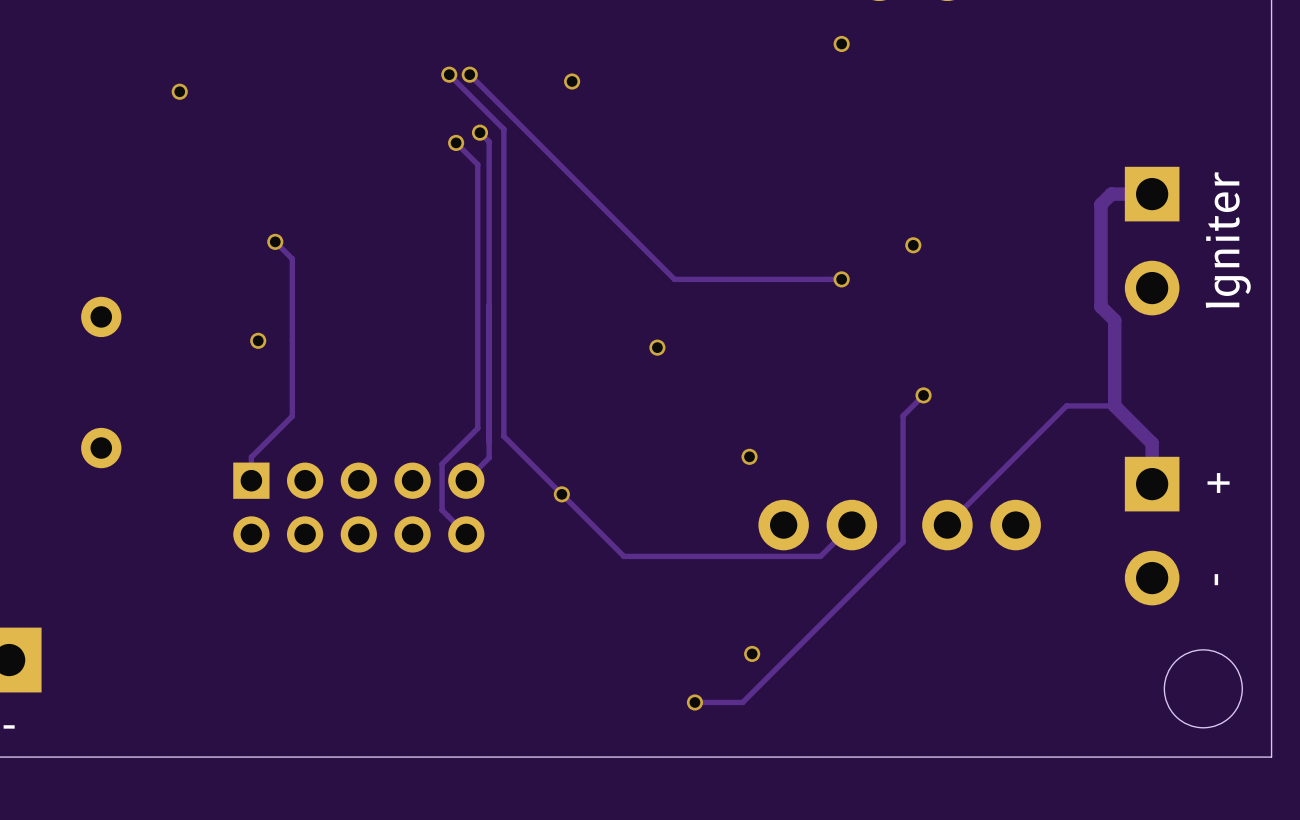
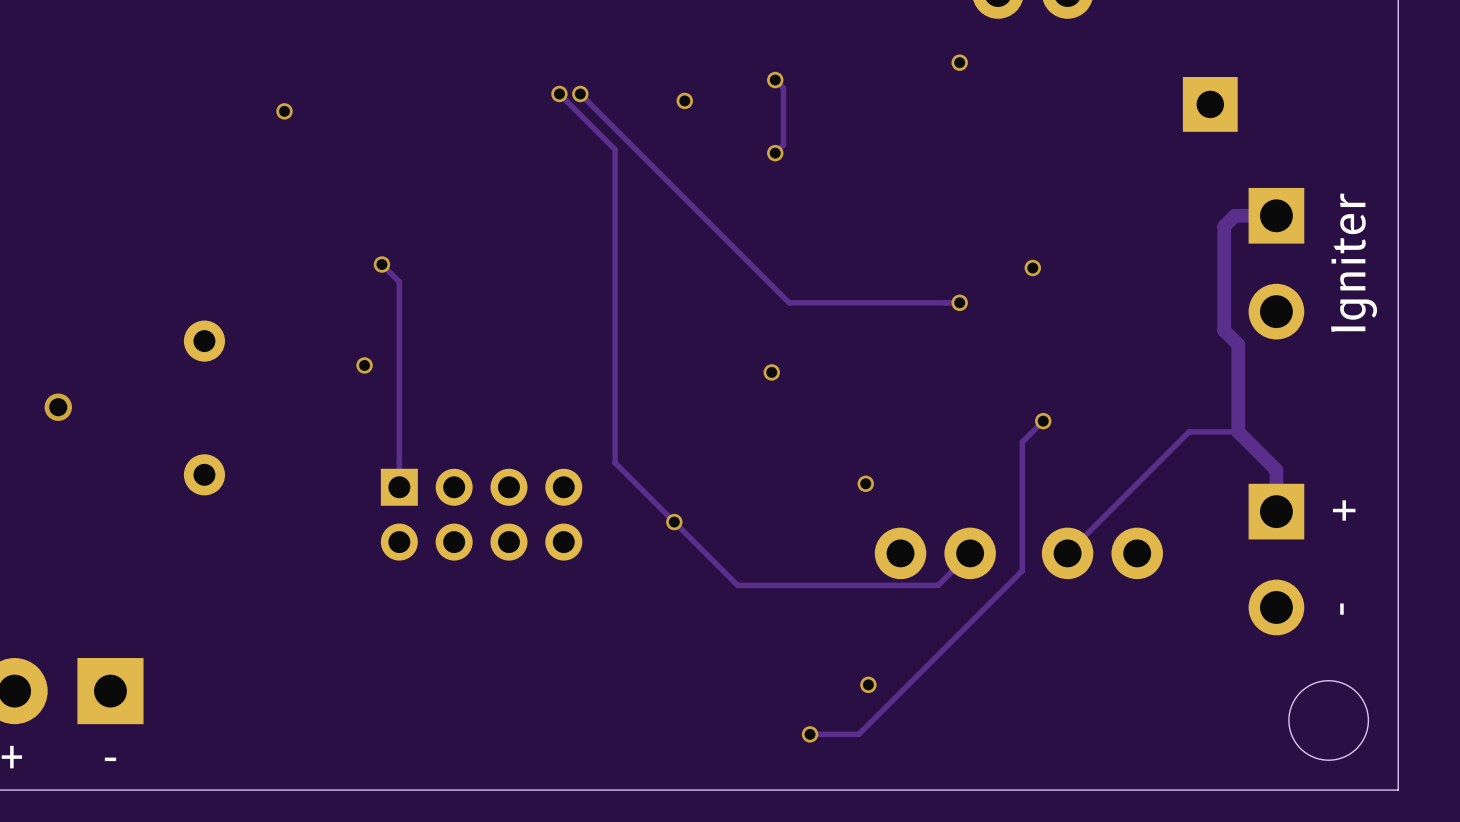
track: none -> (775, 80) (783, 88) (783, 144) (775, 153)
via: none -> (775, 80)
part: none -> (1210, 104)
track: (479, 132) (489, 141) (489, 457) (466, 480) -> none
via: (479, 132) -> none
via: none -> (775, 153)
track: (456, 142) (477, 164) (477, 428) (442, 464) (442, 510) (466, 534) -> none
via: (456, 142) -> none
track: (292, 416) (251, 457) (251, 480) -> (399, 442) (399, 487)
part footprint: [233, 462, 485, 553] -> [380, 468, 583, 561]

